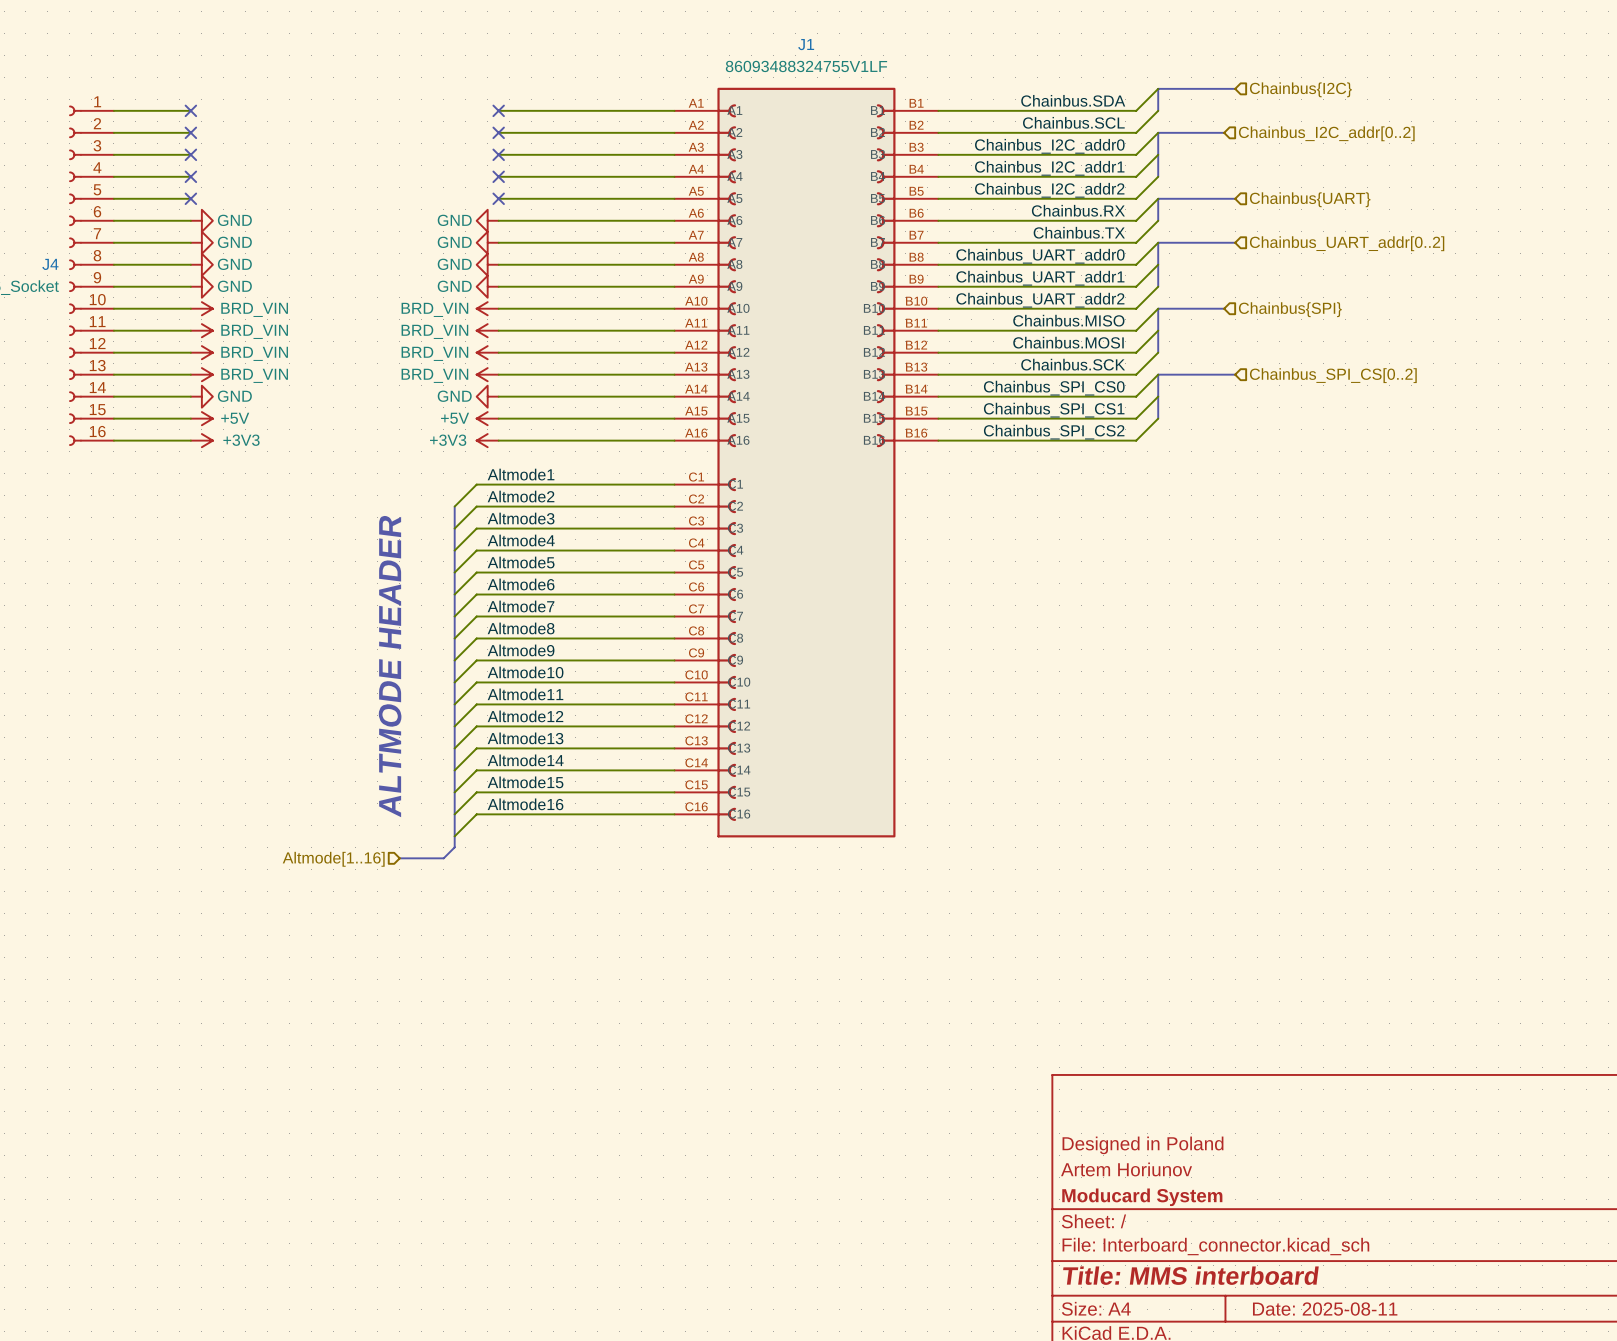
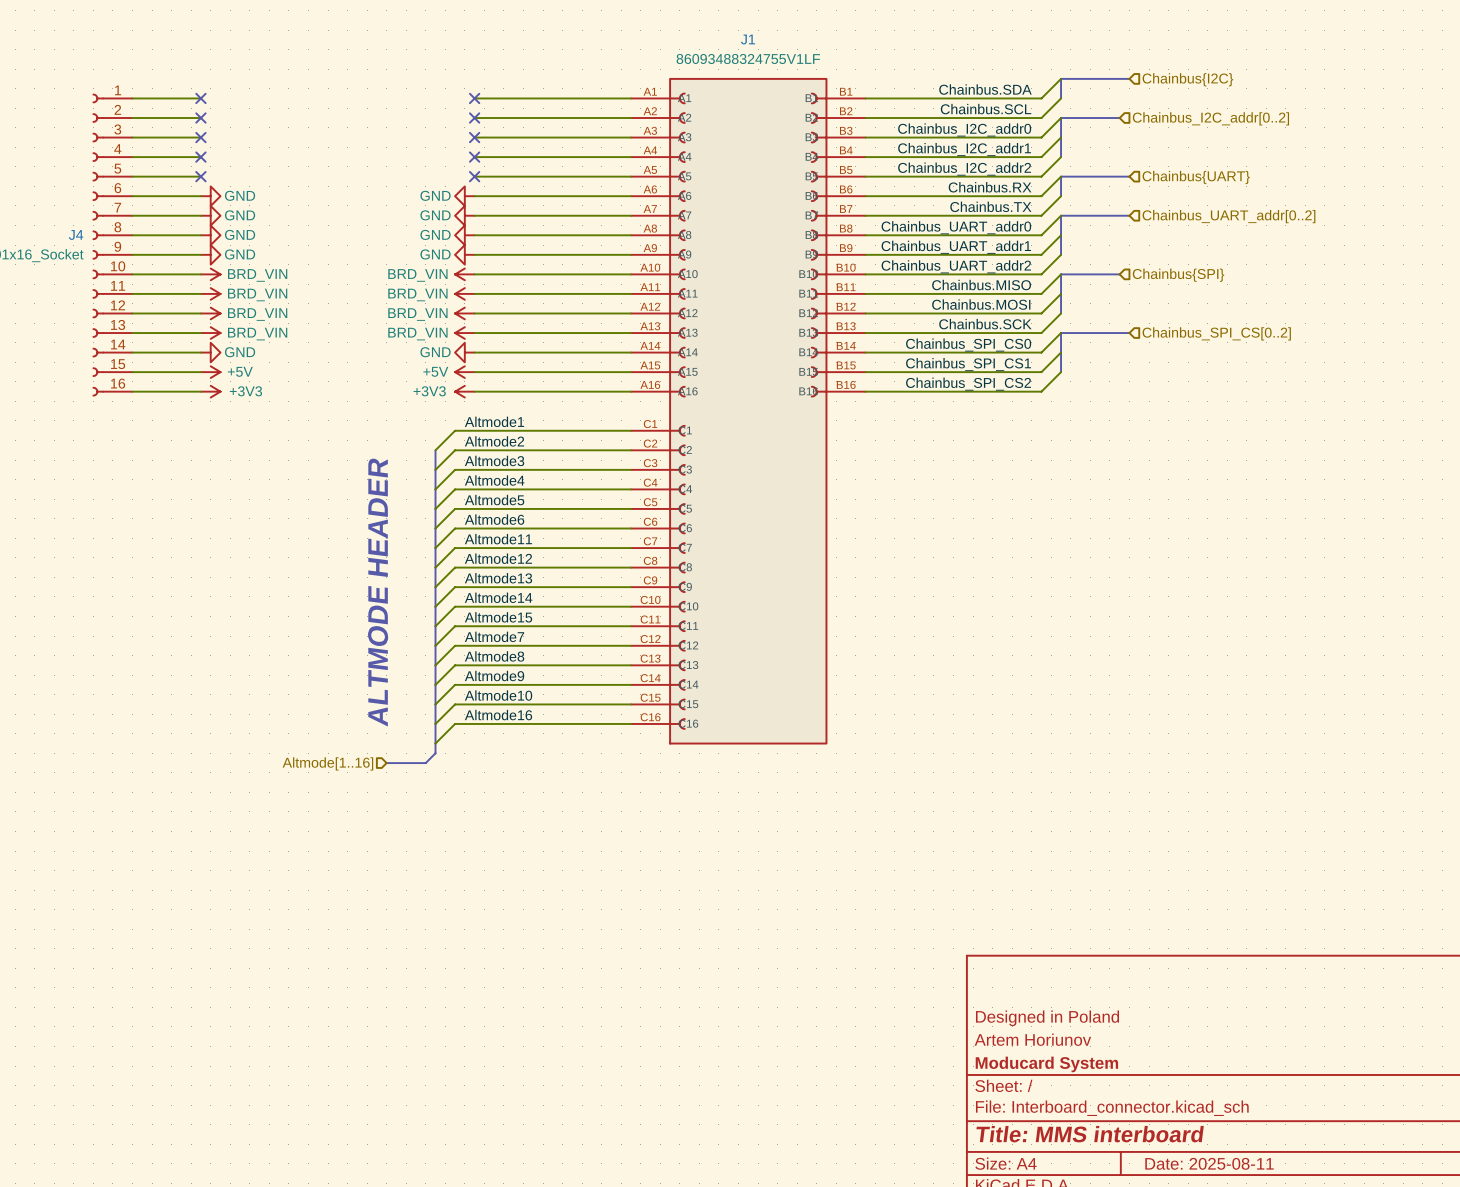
label: Altmode7 (521, 606) -> Altmode11 (498, 539)
label: Altmode8 (521, 628) -> Altmode12 (498, 558)
label: Altmode9 (521, 650) -> Altmode13 (498, 578)
label: Altmode10 (525, 672) -> Altmode14 (498, 597)
label: Altmode11 (525, 694) -> Altmode15 (498, 617)
label: Altmode12 (525, 716) -> Altmode7 (494, 636)
label: Altmode13 (525, 738) -> Altmode8 (494, 656)
label: Altmode14 (525, 760) -> Altmode9 (494, 675)
label: Altmode15 (525, 782) -> Altmode10 (498, 695)

